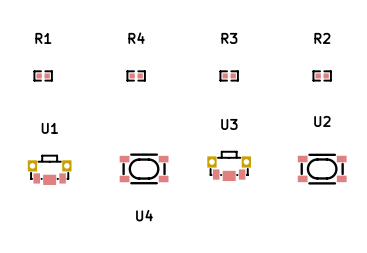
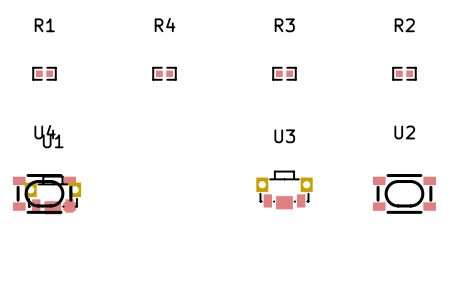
U4 footprint: [119, 153, 169, 185] -> [13, 174, 77, 214]
U4 name position: U4 (144, 215) -> U4 (45, 132)

